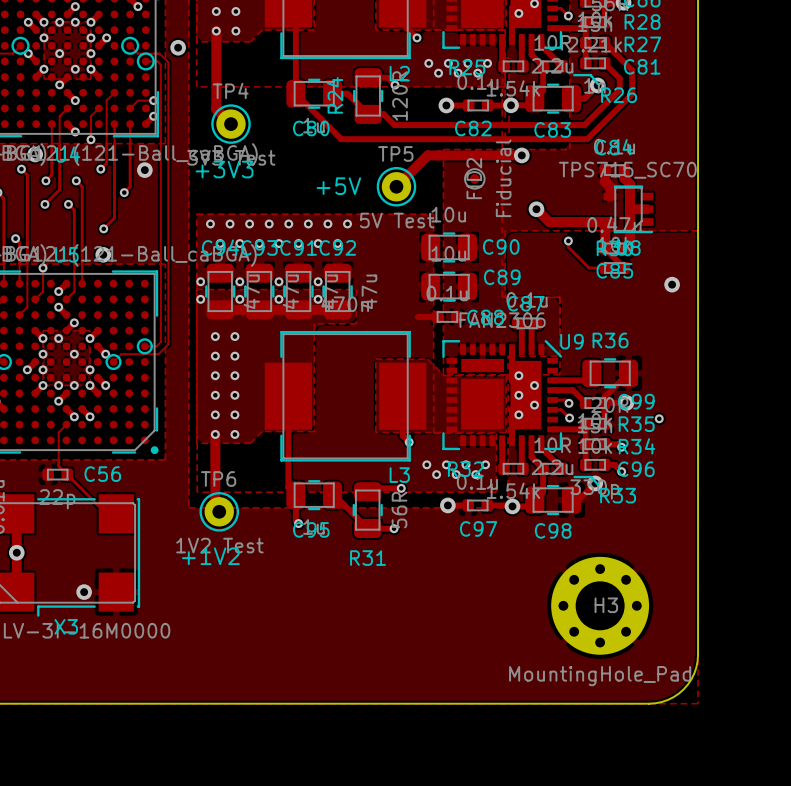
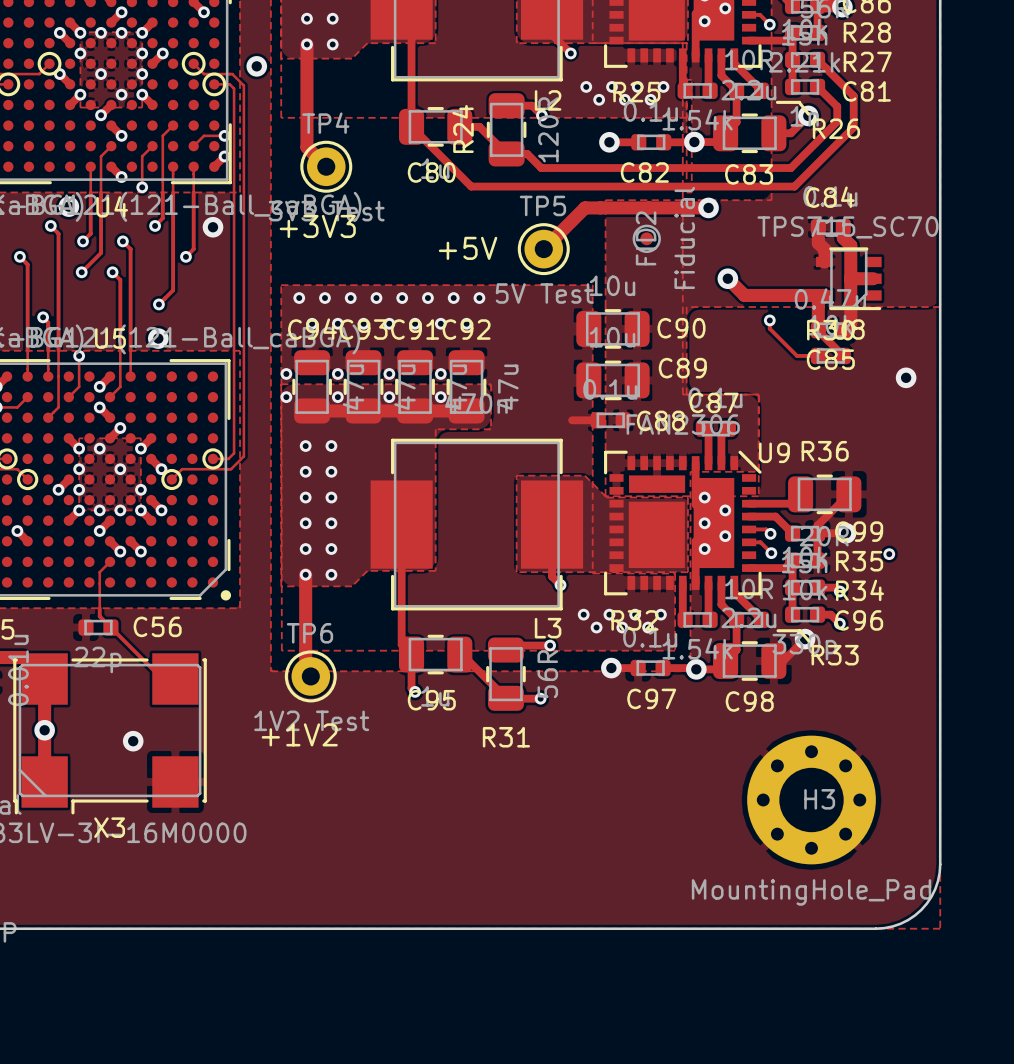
via position: (84, 592) -> (133, 741)

